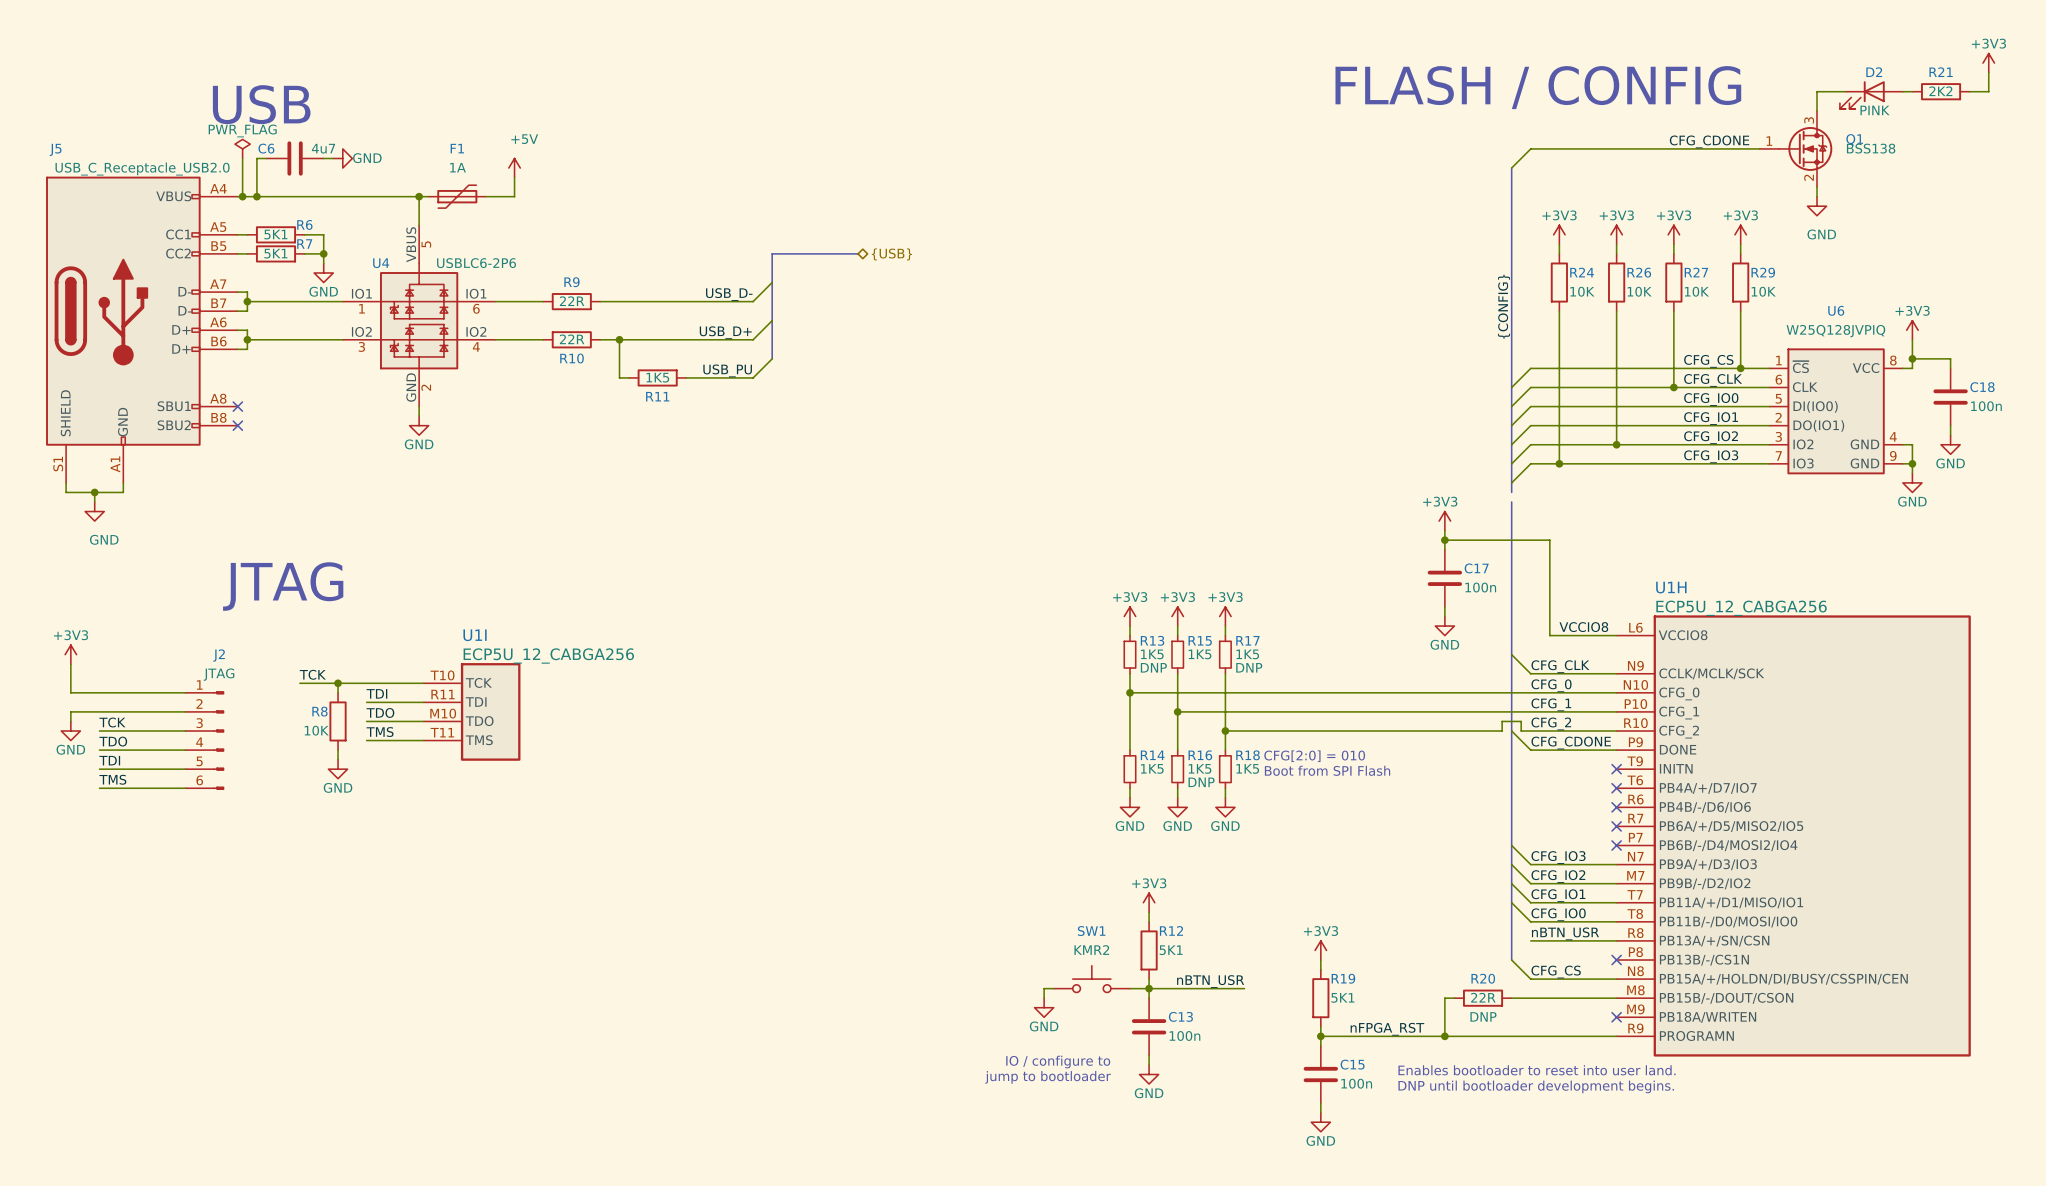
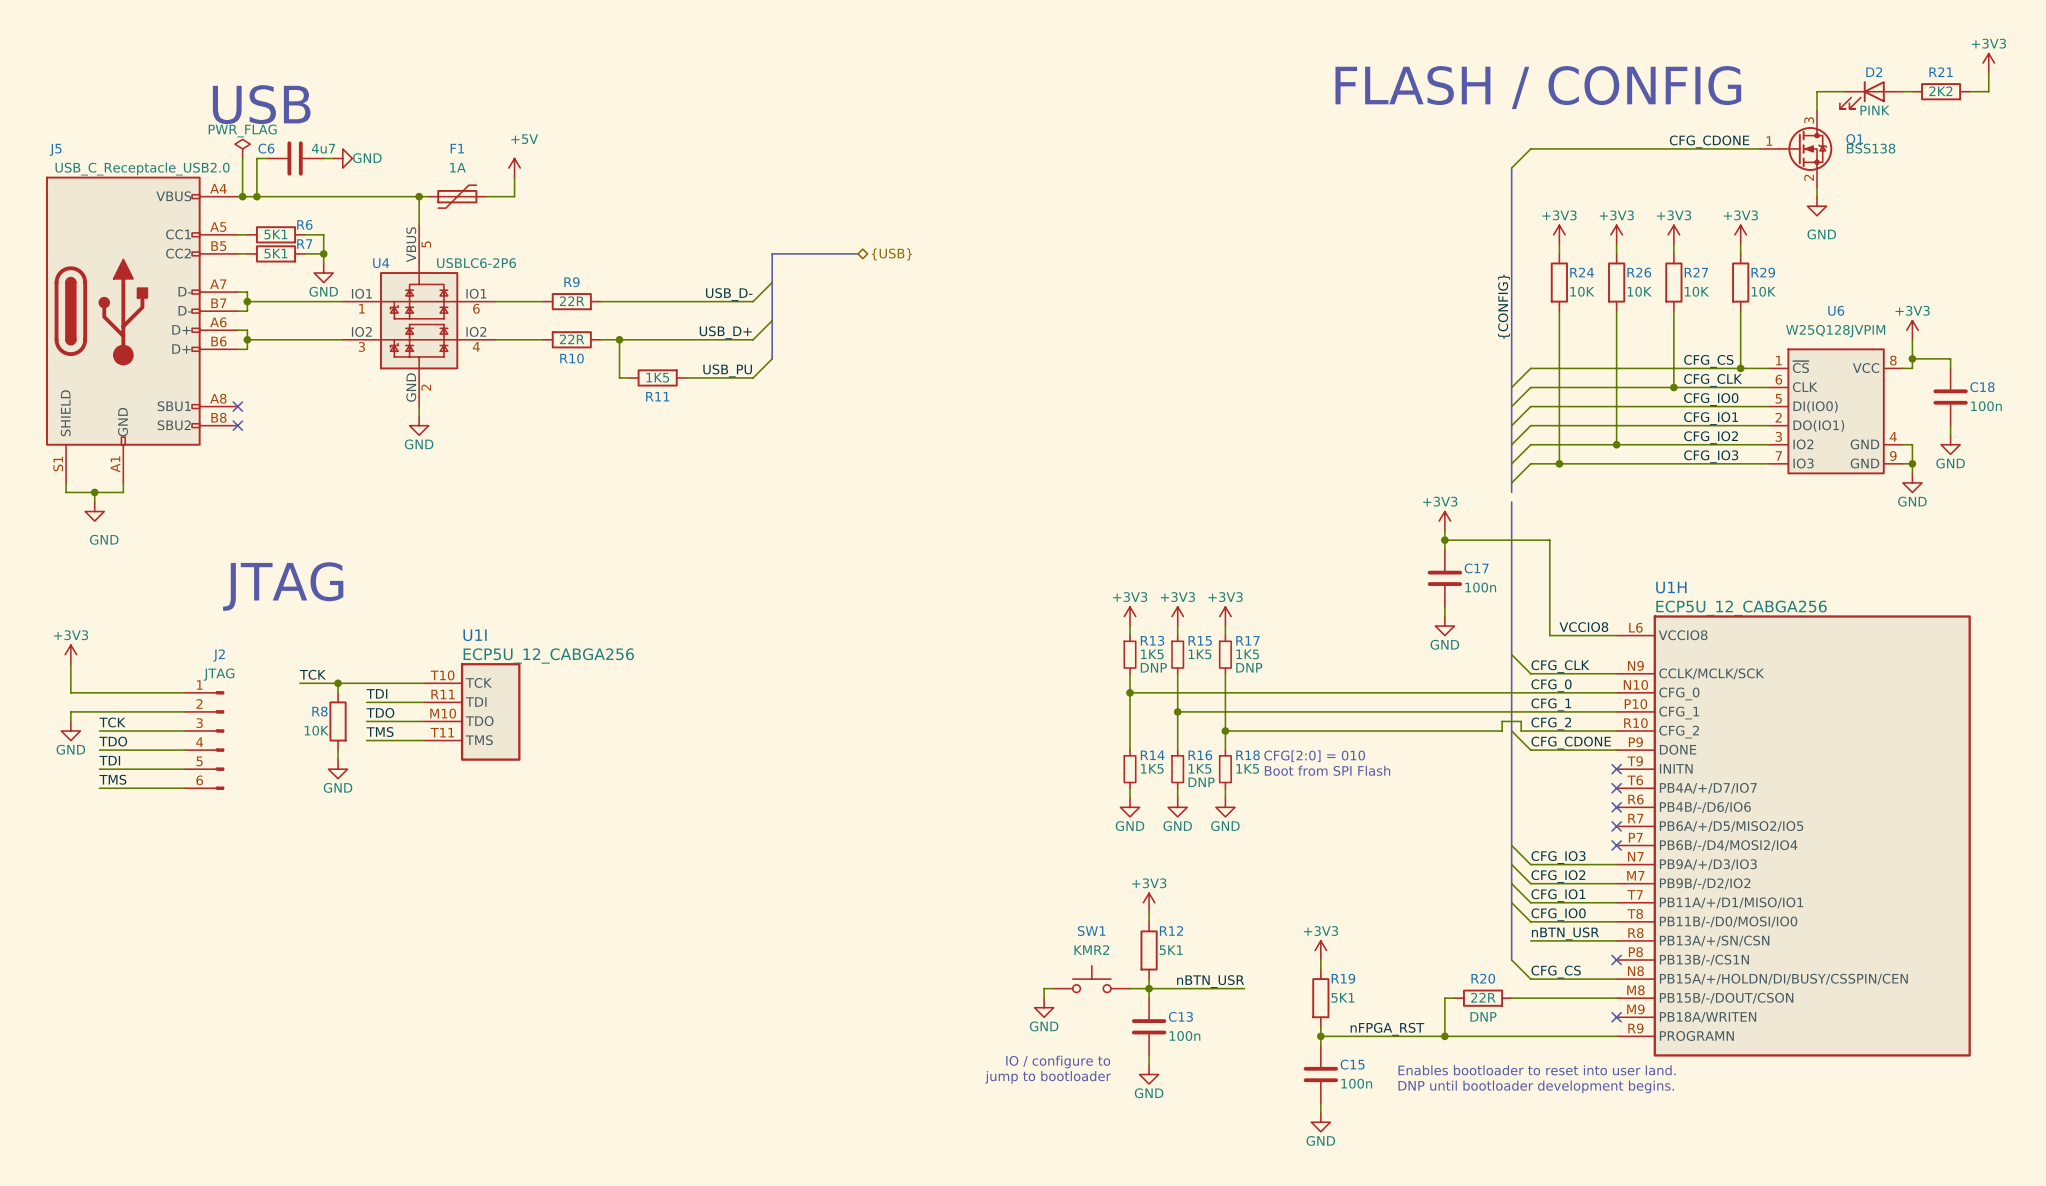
U6 value: W25Q128JVPIQ (1835, 331) -> W25Q128JVPIM (1835, 331)

